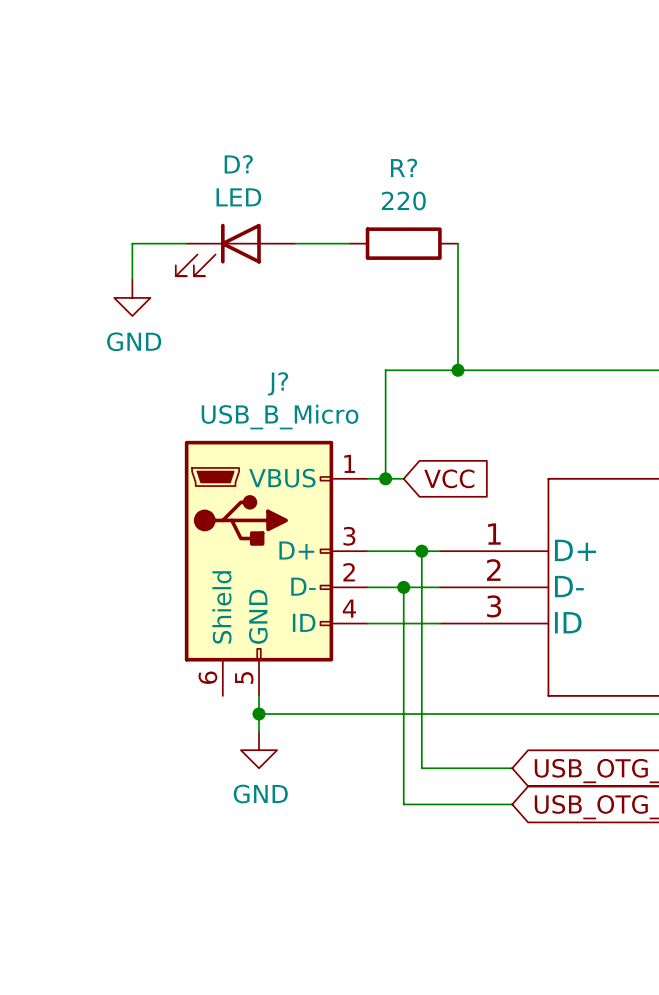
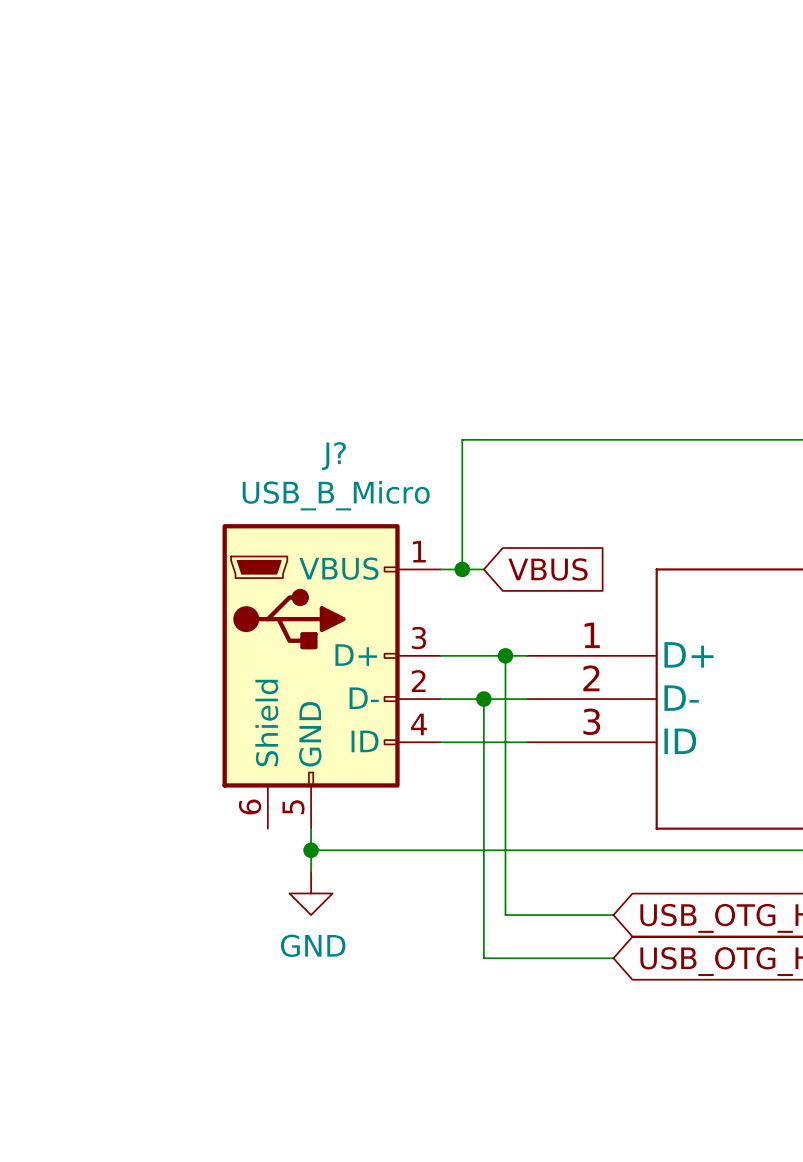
wire: (186, 243) (132, 243) (132, 279) -> none
wire: (295, 243) (349, 243) -> none
R?: 220 (403, 243) -> none
wire: (457, 243) (457, 370) -> none
D?: LED (235, 249) -> none
power symbol: GND (132, 297) -> none
junction: (457, 370) -> none
global label: VCC (449, 478) -> VBUS (548, 569)

